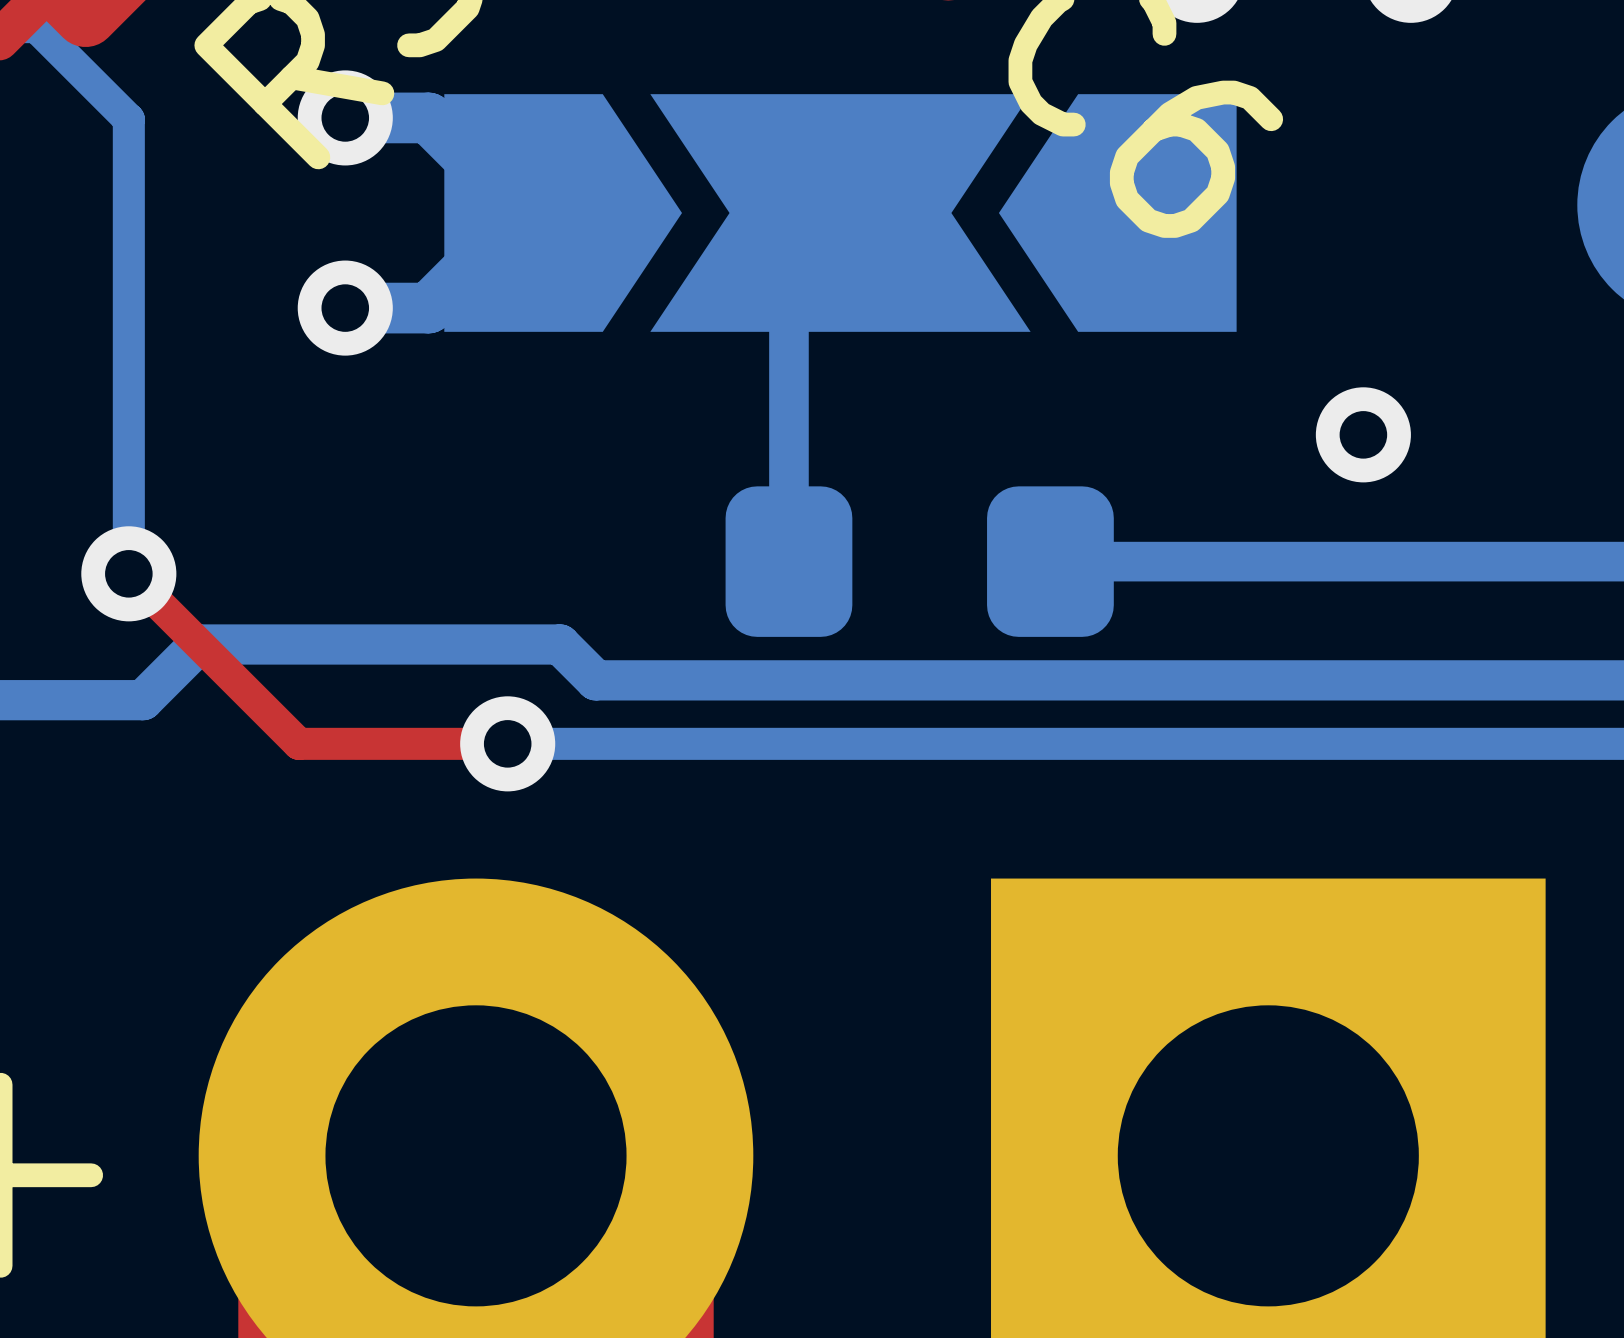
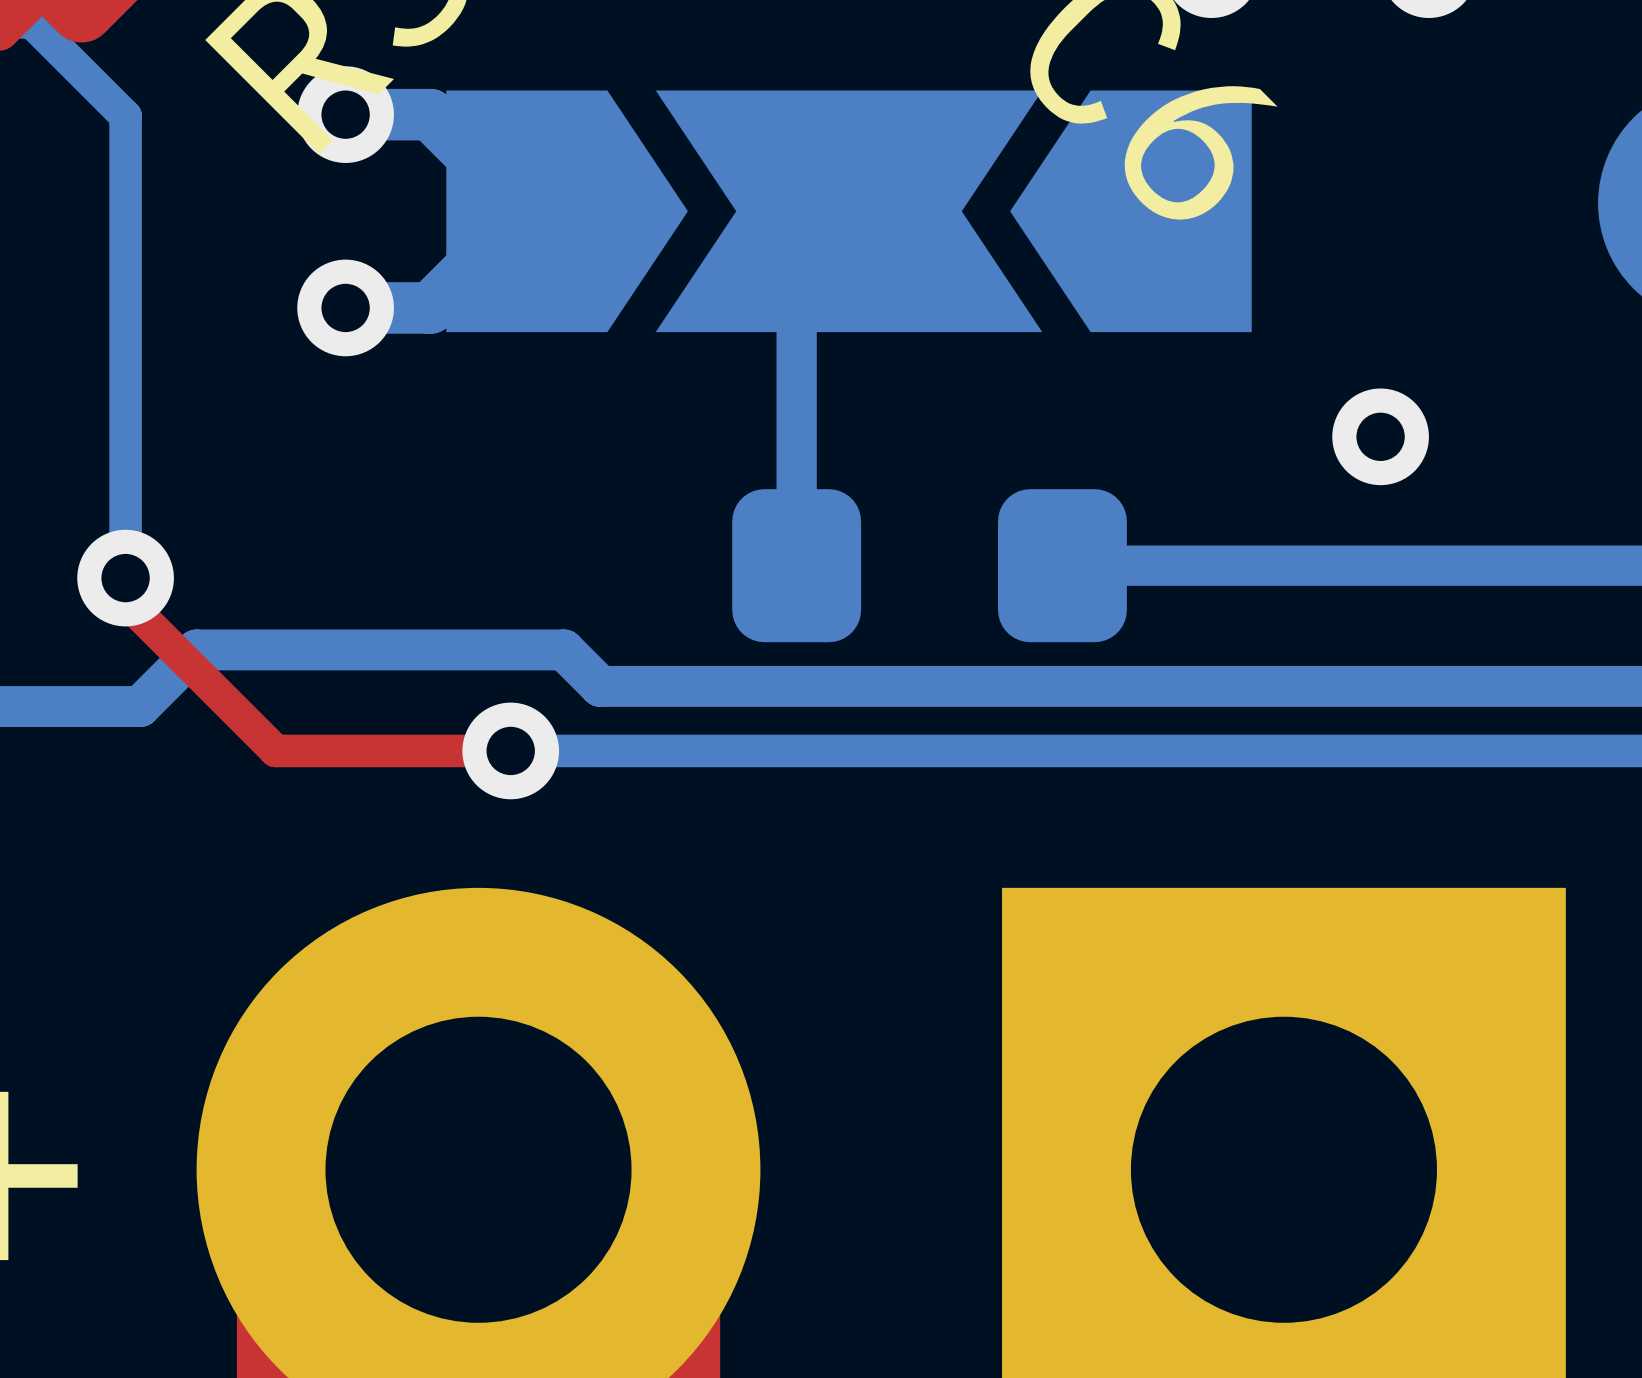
top track: (128, 573) (298, 743) -> (125, 578) (125, 600) (275, 750) (298, 750)

